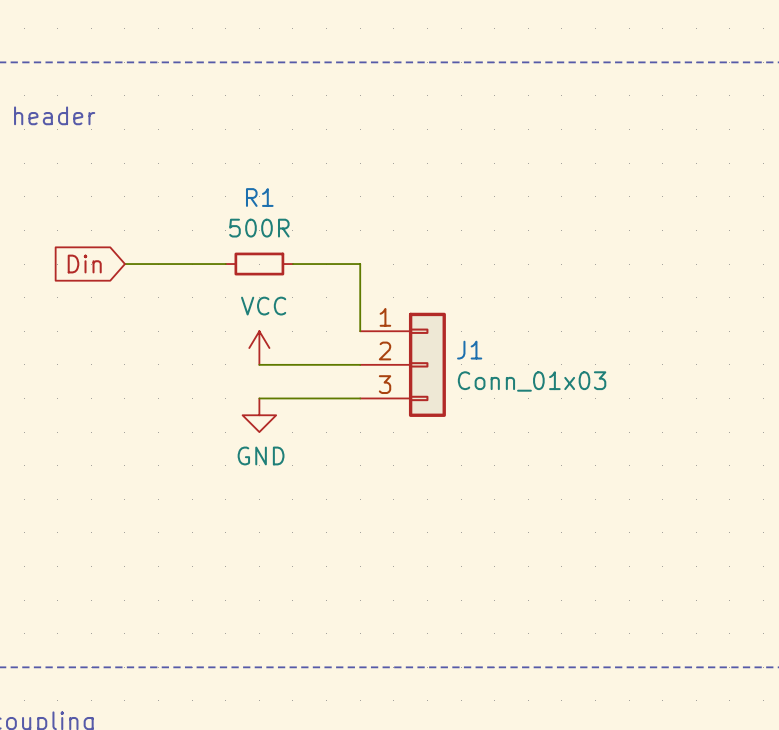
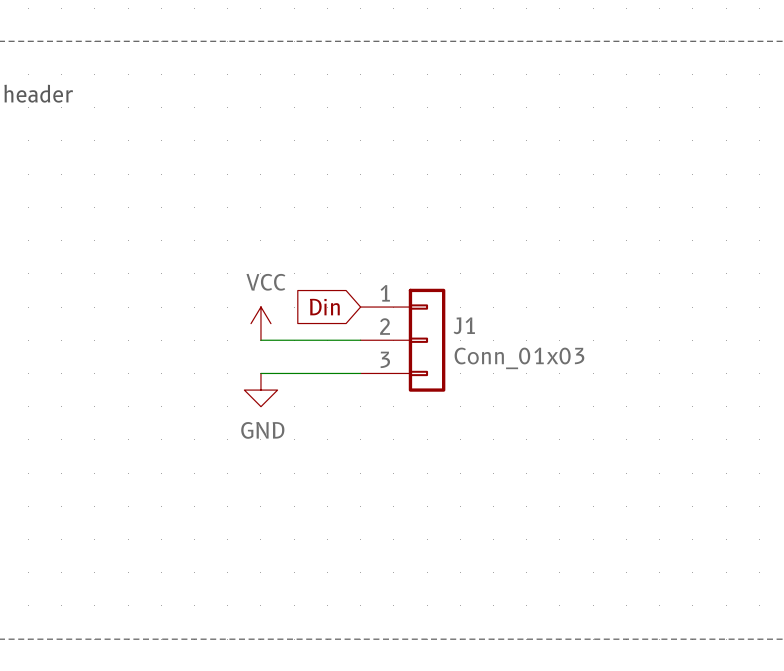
global label position: Din (84, 264) -> Din (324, 307)
wire: (124, 264) (225, 264) -> none
R1: 500R (259, 264) -> none
wire: (292, 264) (360, 264) (360, 331) -> none

